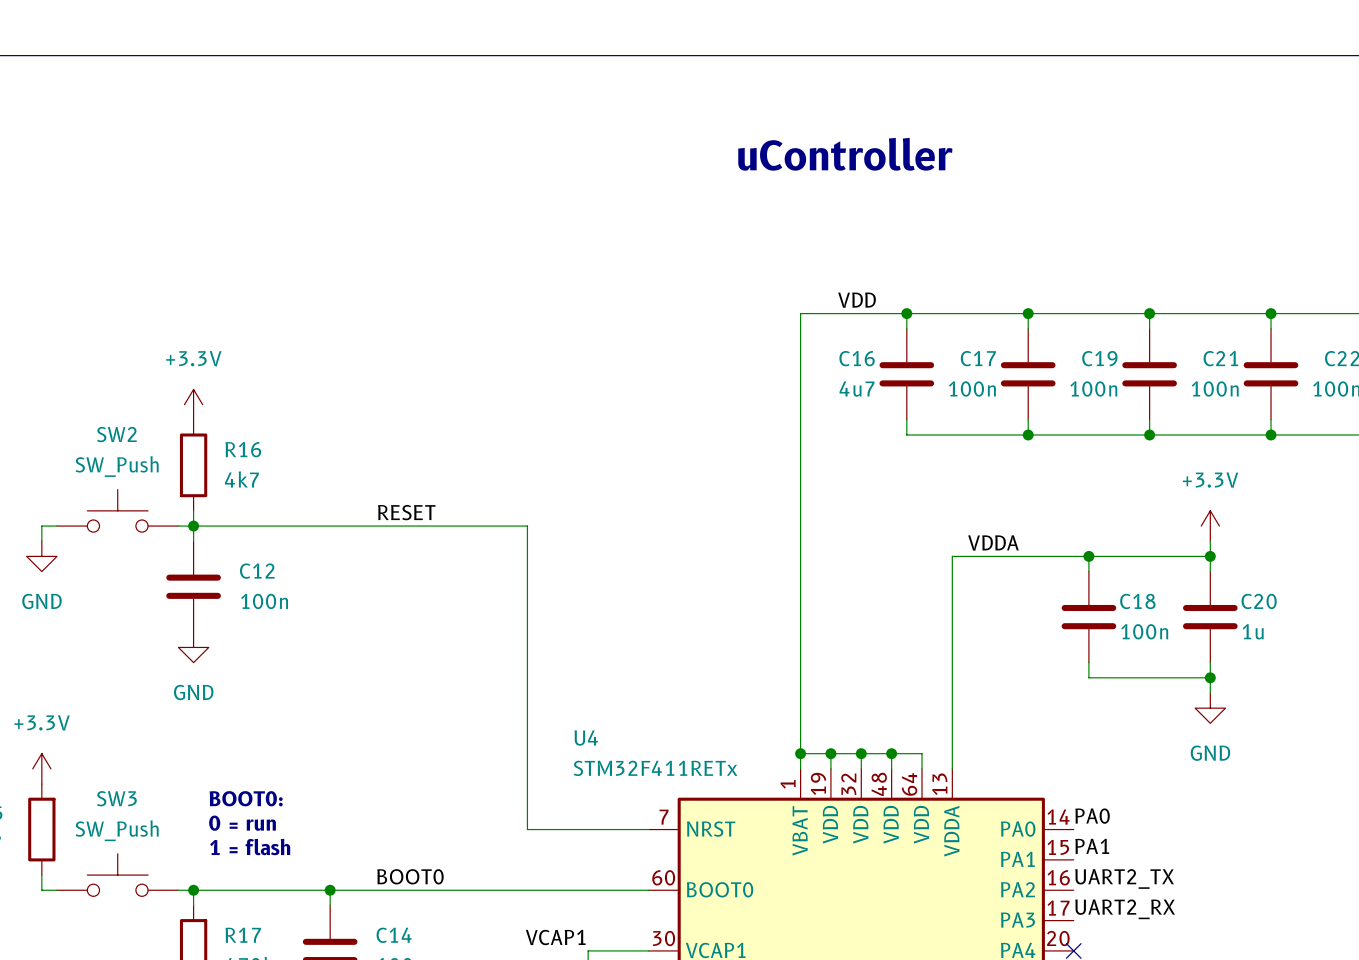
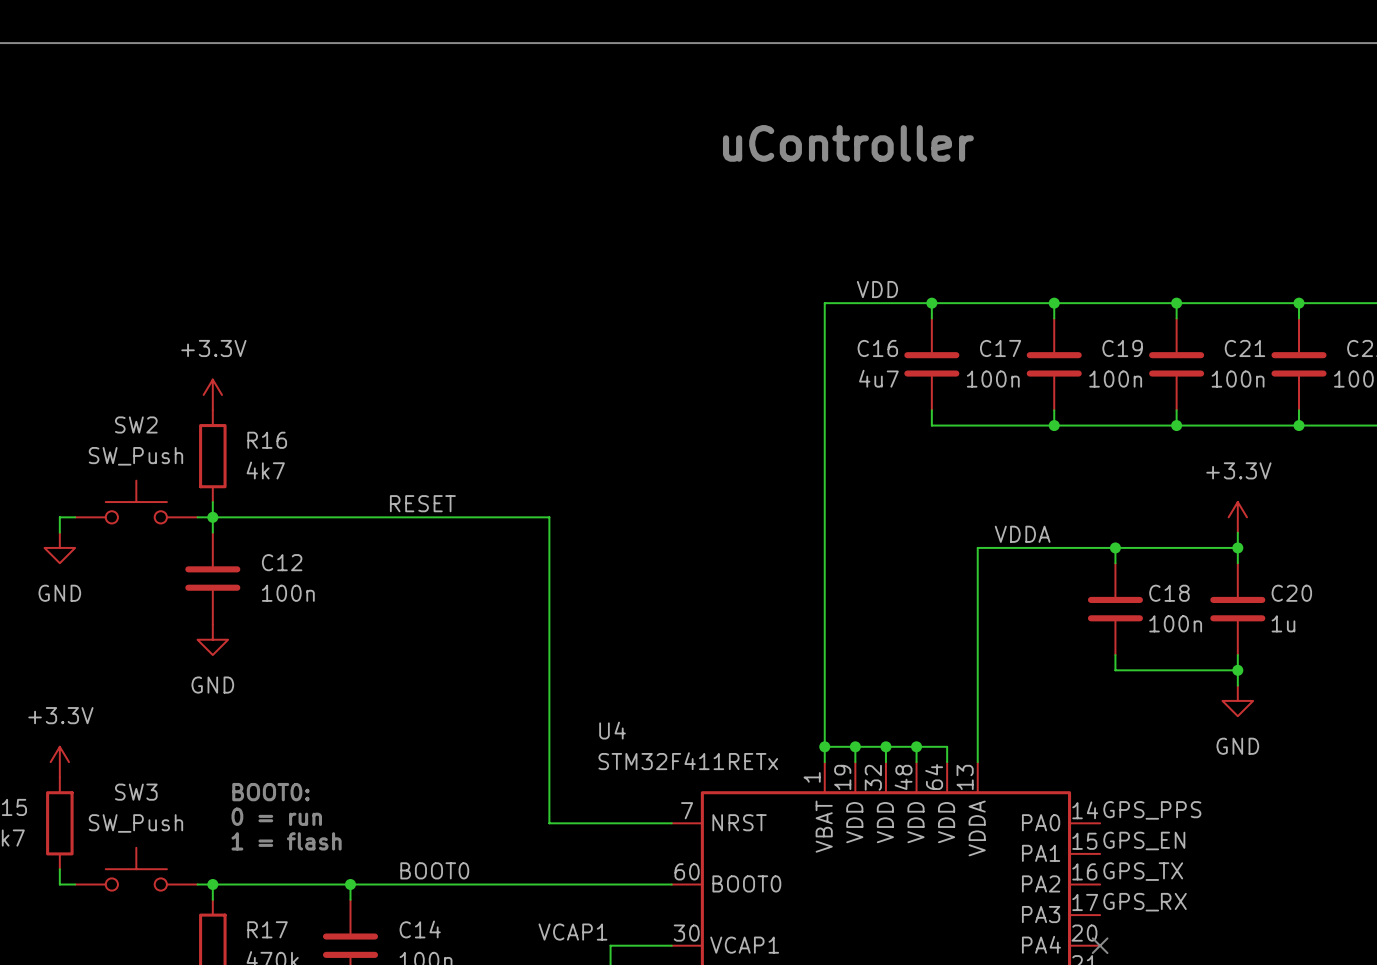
label: PA0 (1092, 816) -> GPS_PPS (1152, 810)
label: PA1 (1092, 846) -> GPS_EN (1144, 840)
label: UART2_TX (1124, 878) -> GPS_TX (1143, 871)
label: UART2_RX (1125, 909) -> GPS_RX (1145, 902)

